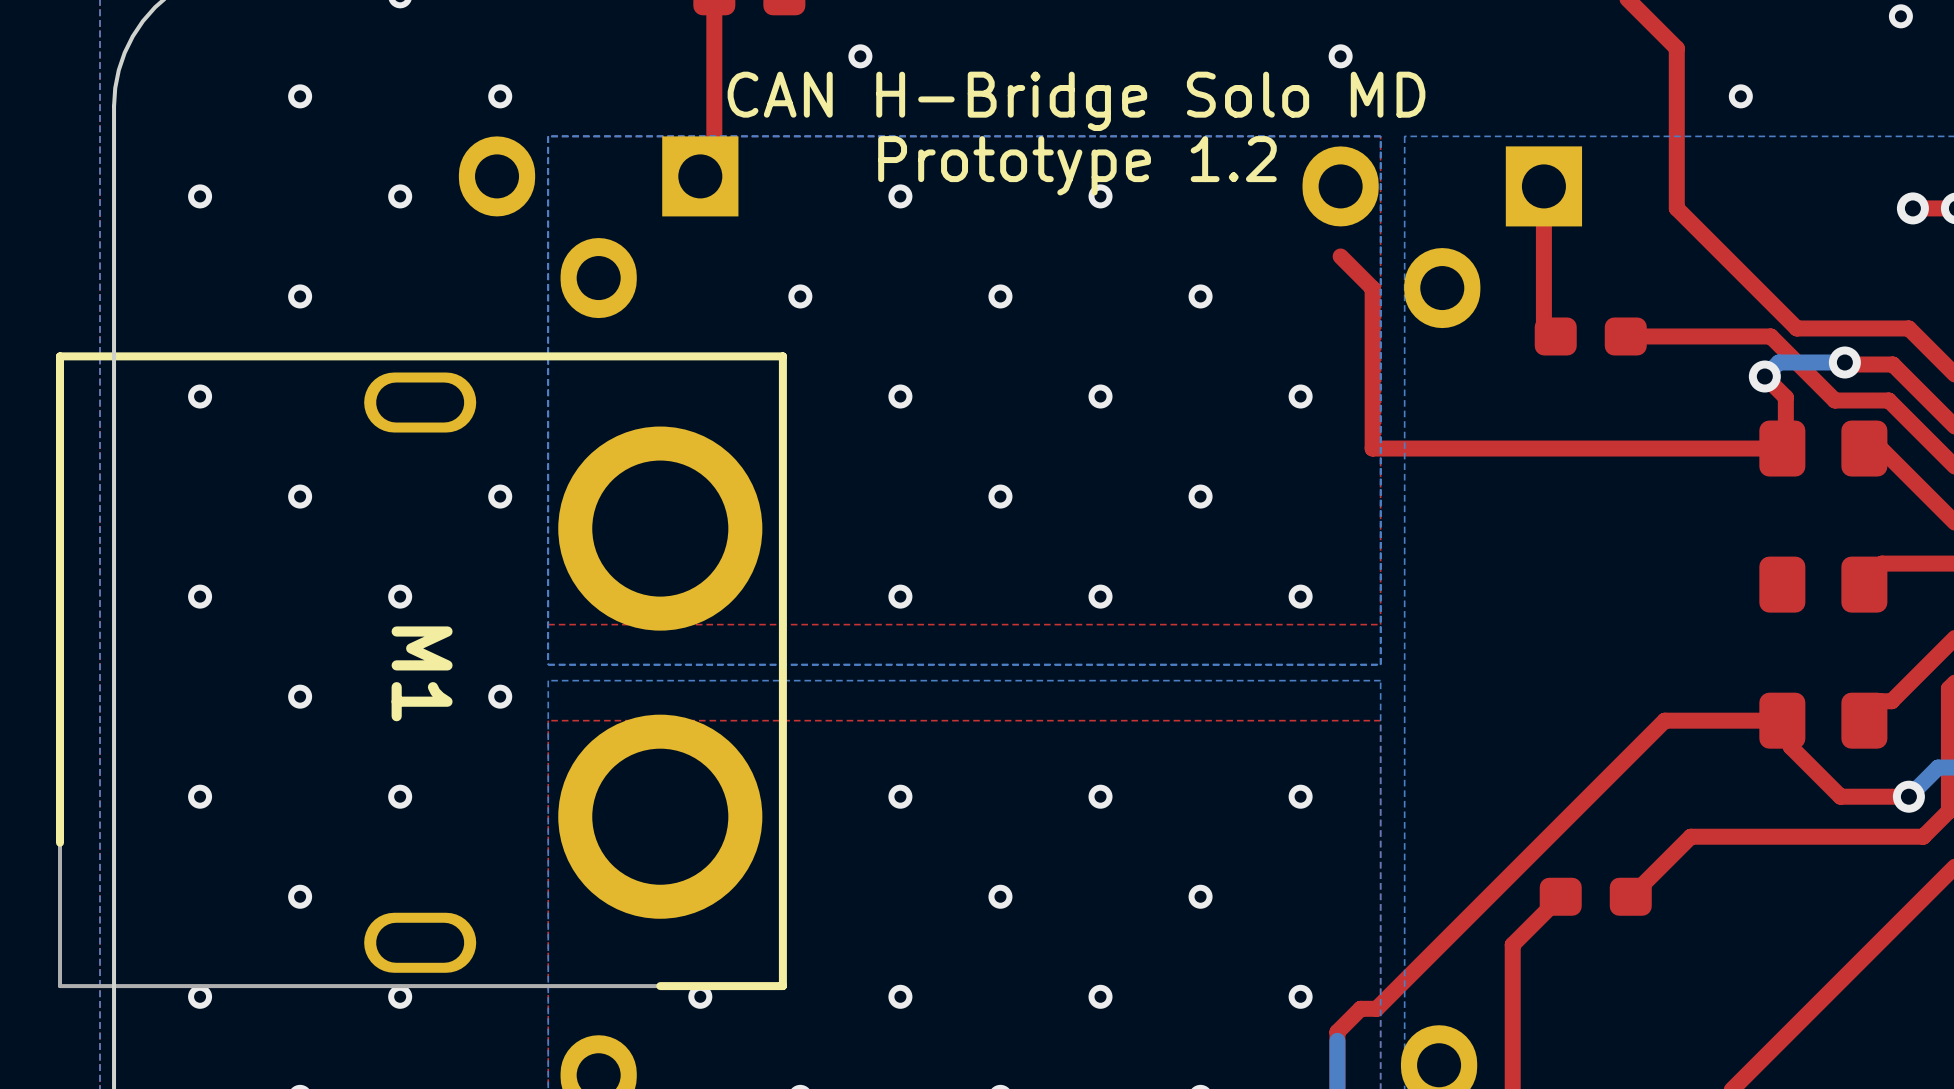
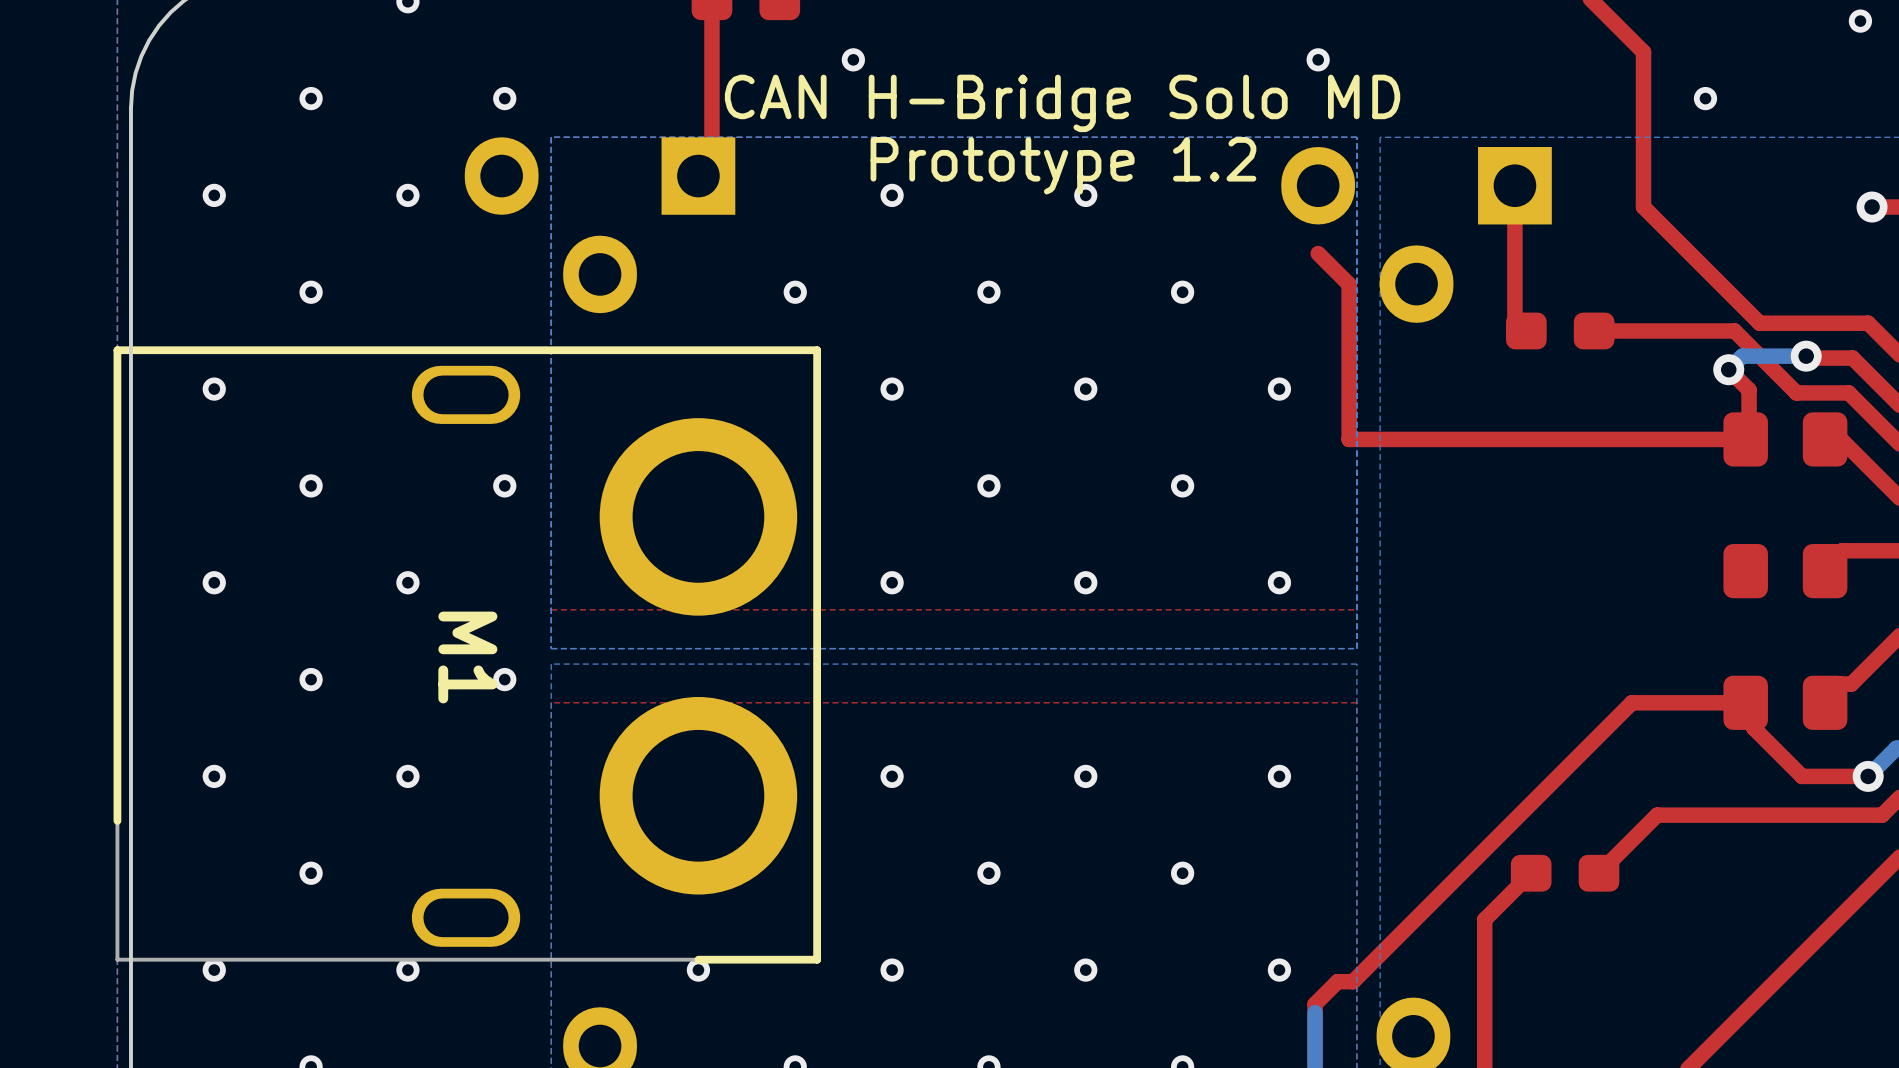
M1 position: (421, 671) -> (467, 654)

